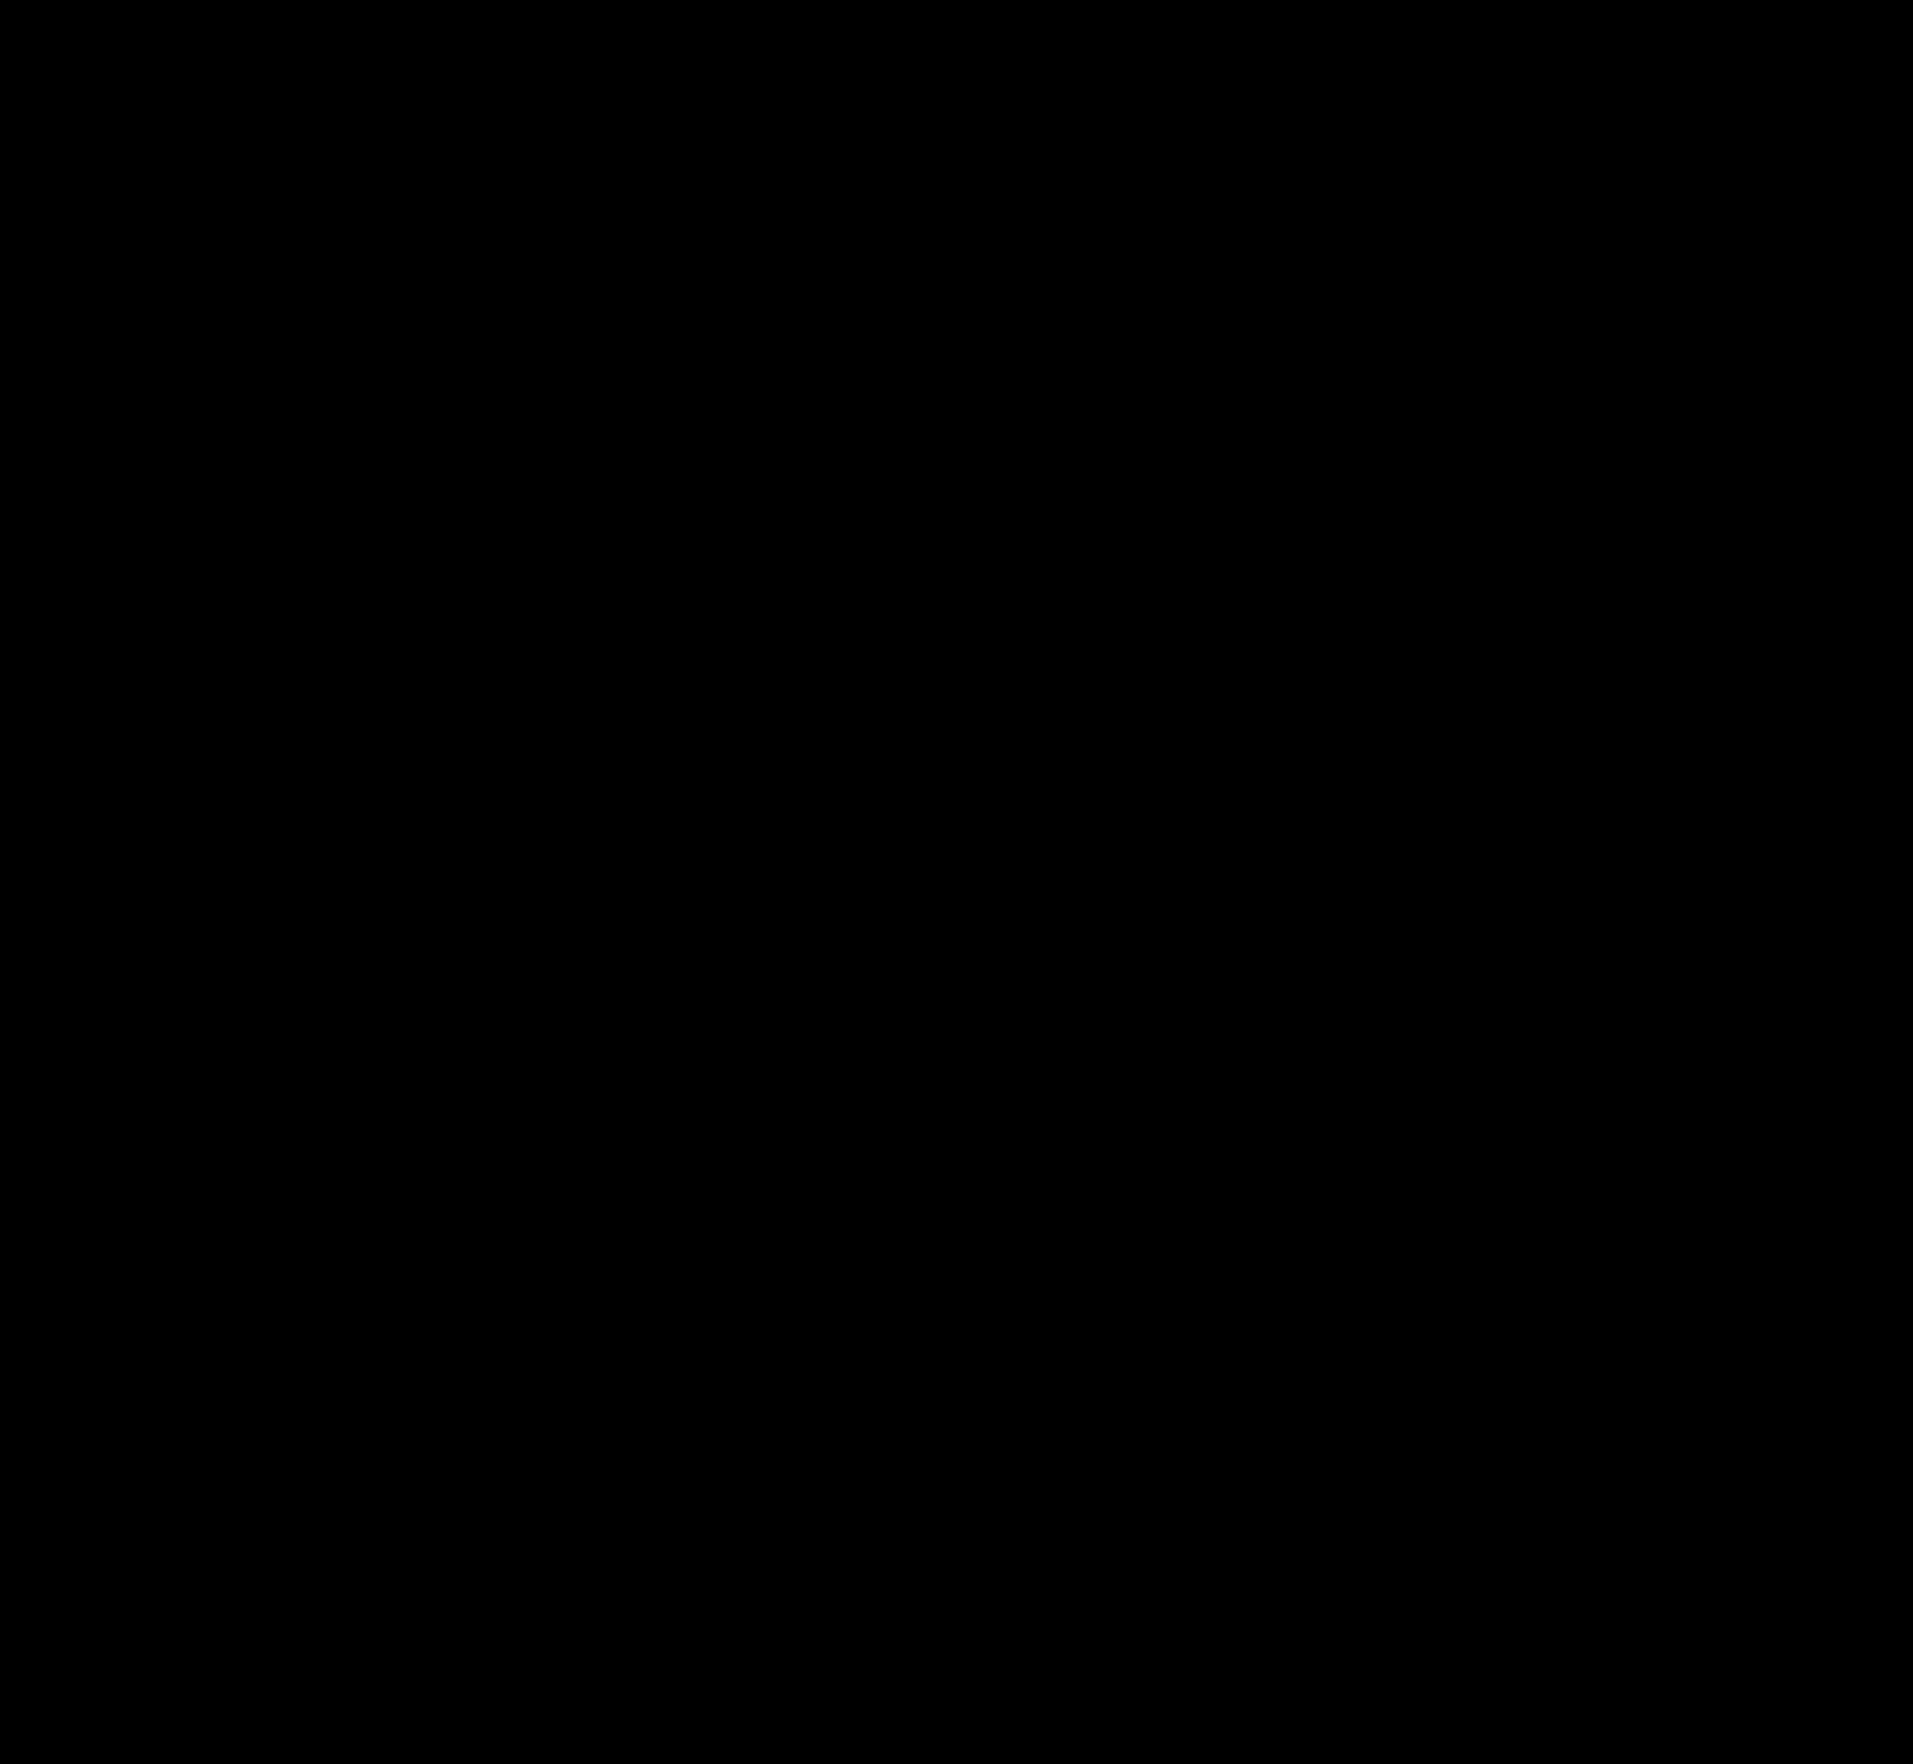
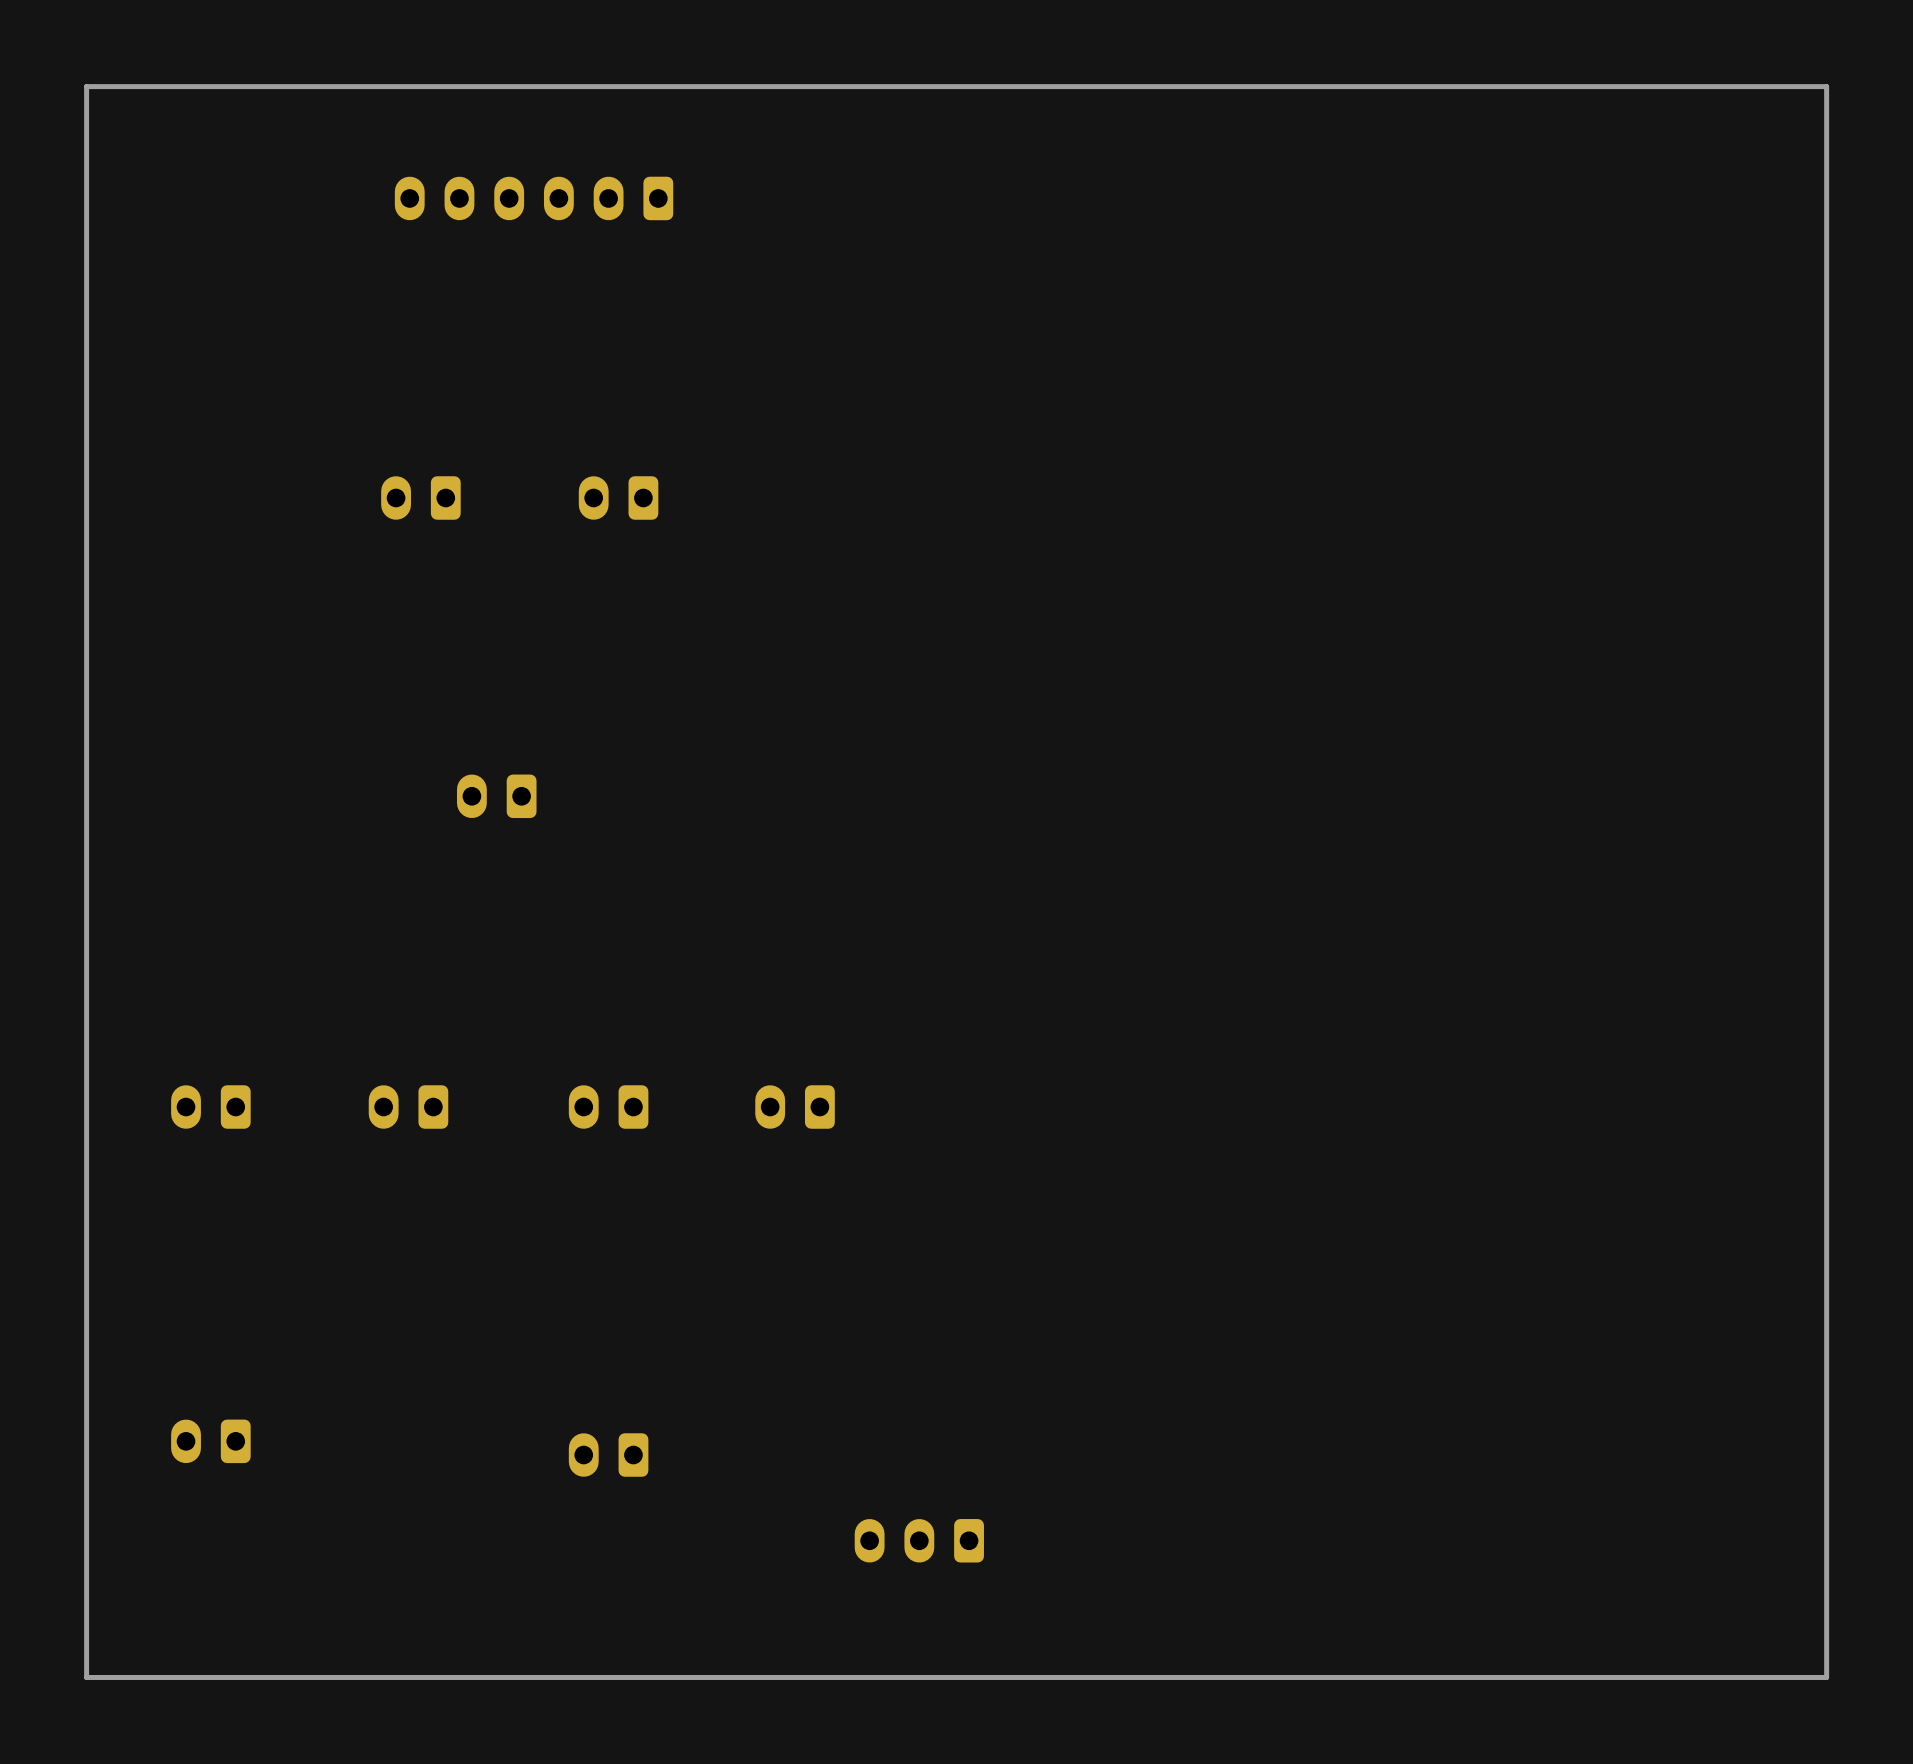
board edge: none -> (1826, 86) (86, 86) (86, 1677) (1826, 1677) (1826, 86)
part: none -> (534, 198)
part: none -> (420, 497)
part: none -> (618, 497)
part: none -> (496, 796)
part: none -> (210, 1107)
part: none -> (408, 1107)
part: none -> (608, 1107)
part: none -> (795, 1107)
part: none -> (210, 1441)
part: none -> (608, 1455)
part: none -> (919, 1540)

